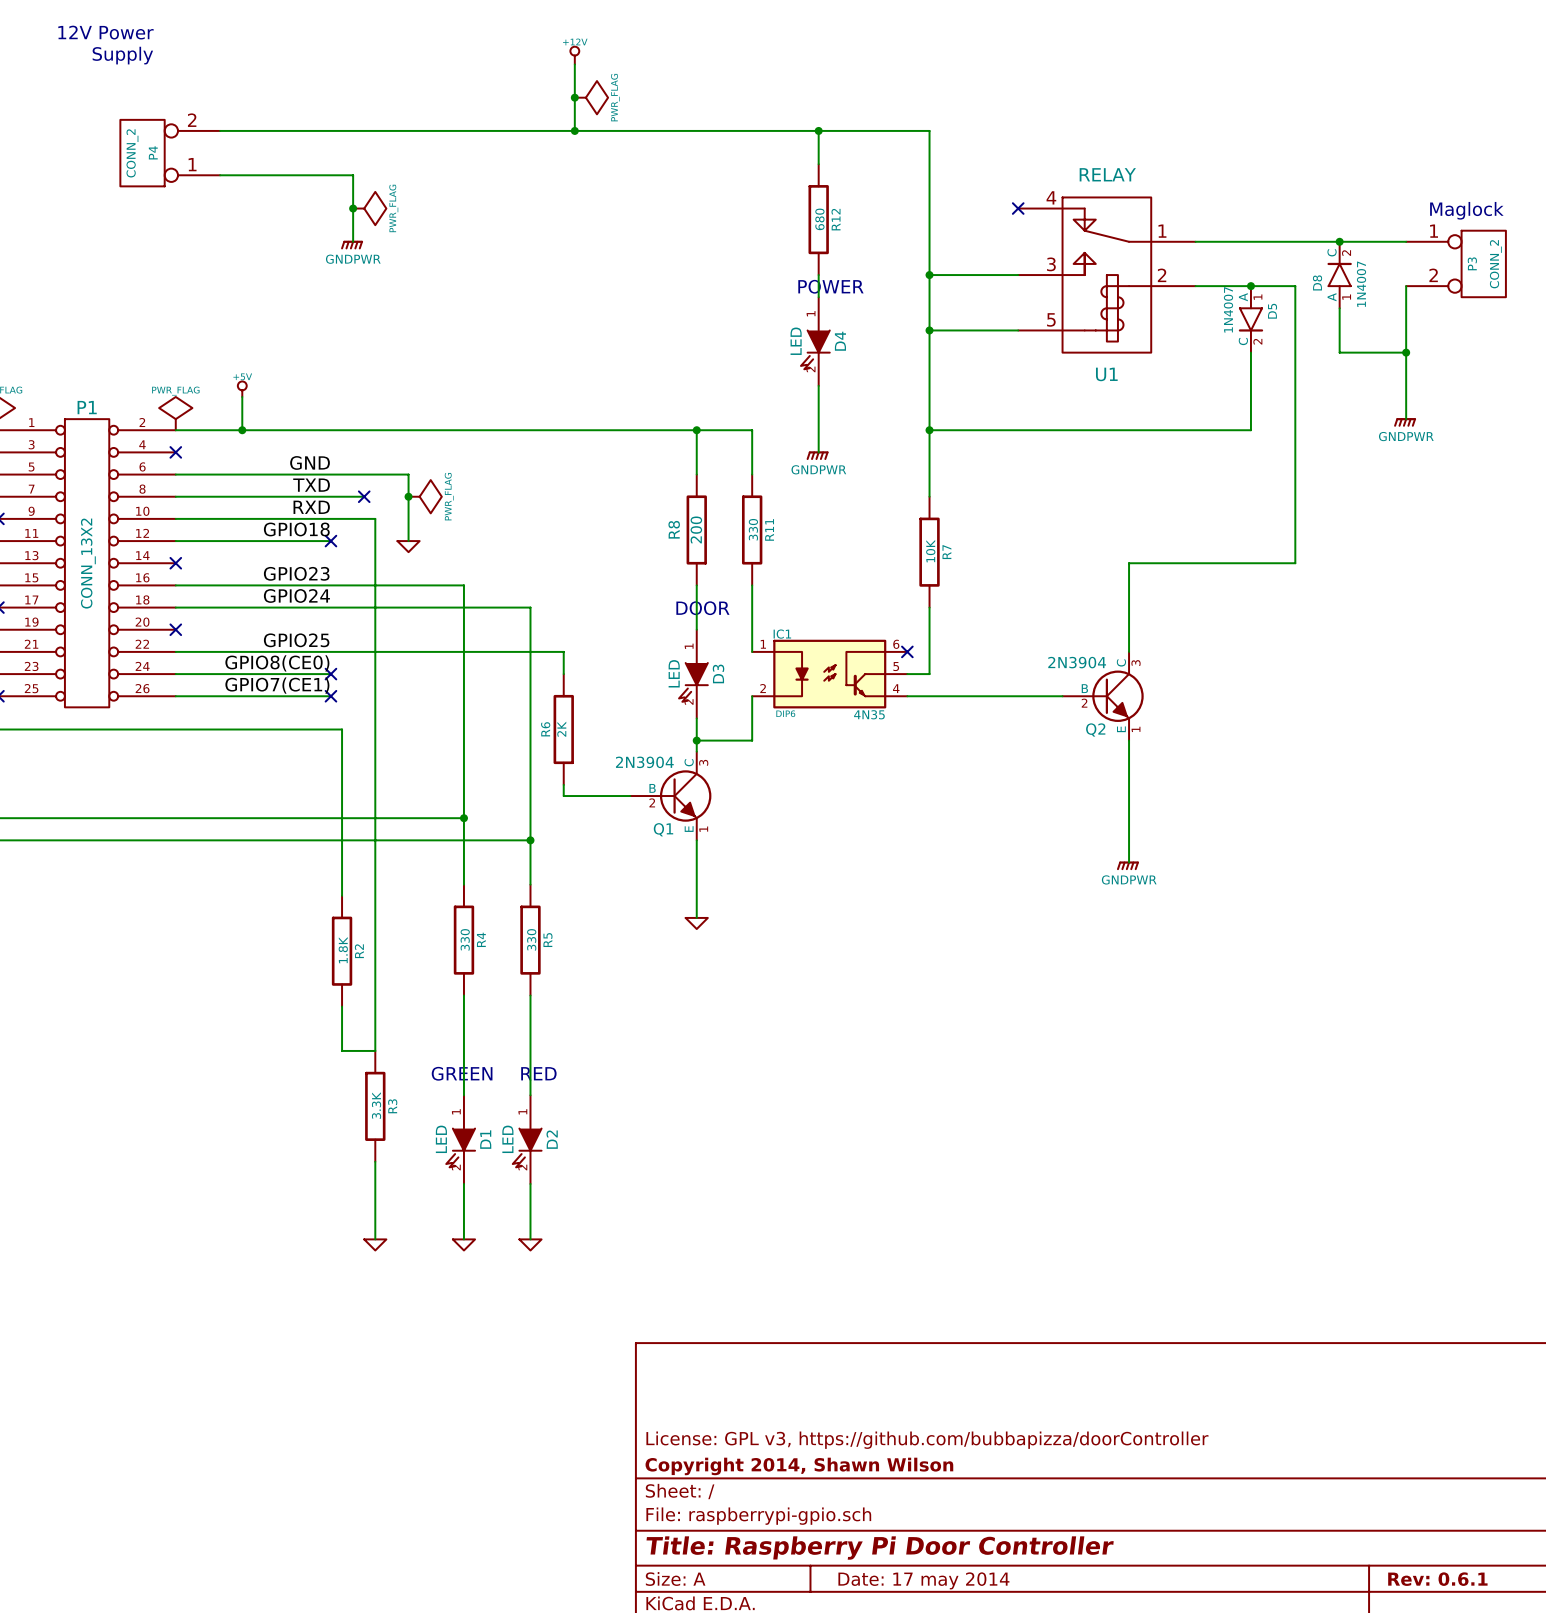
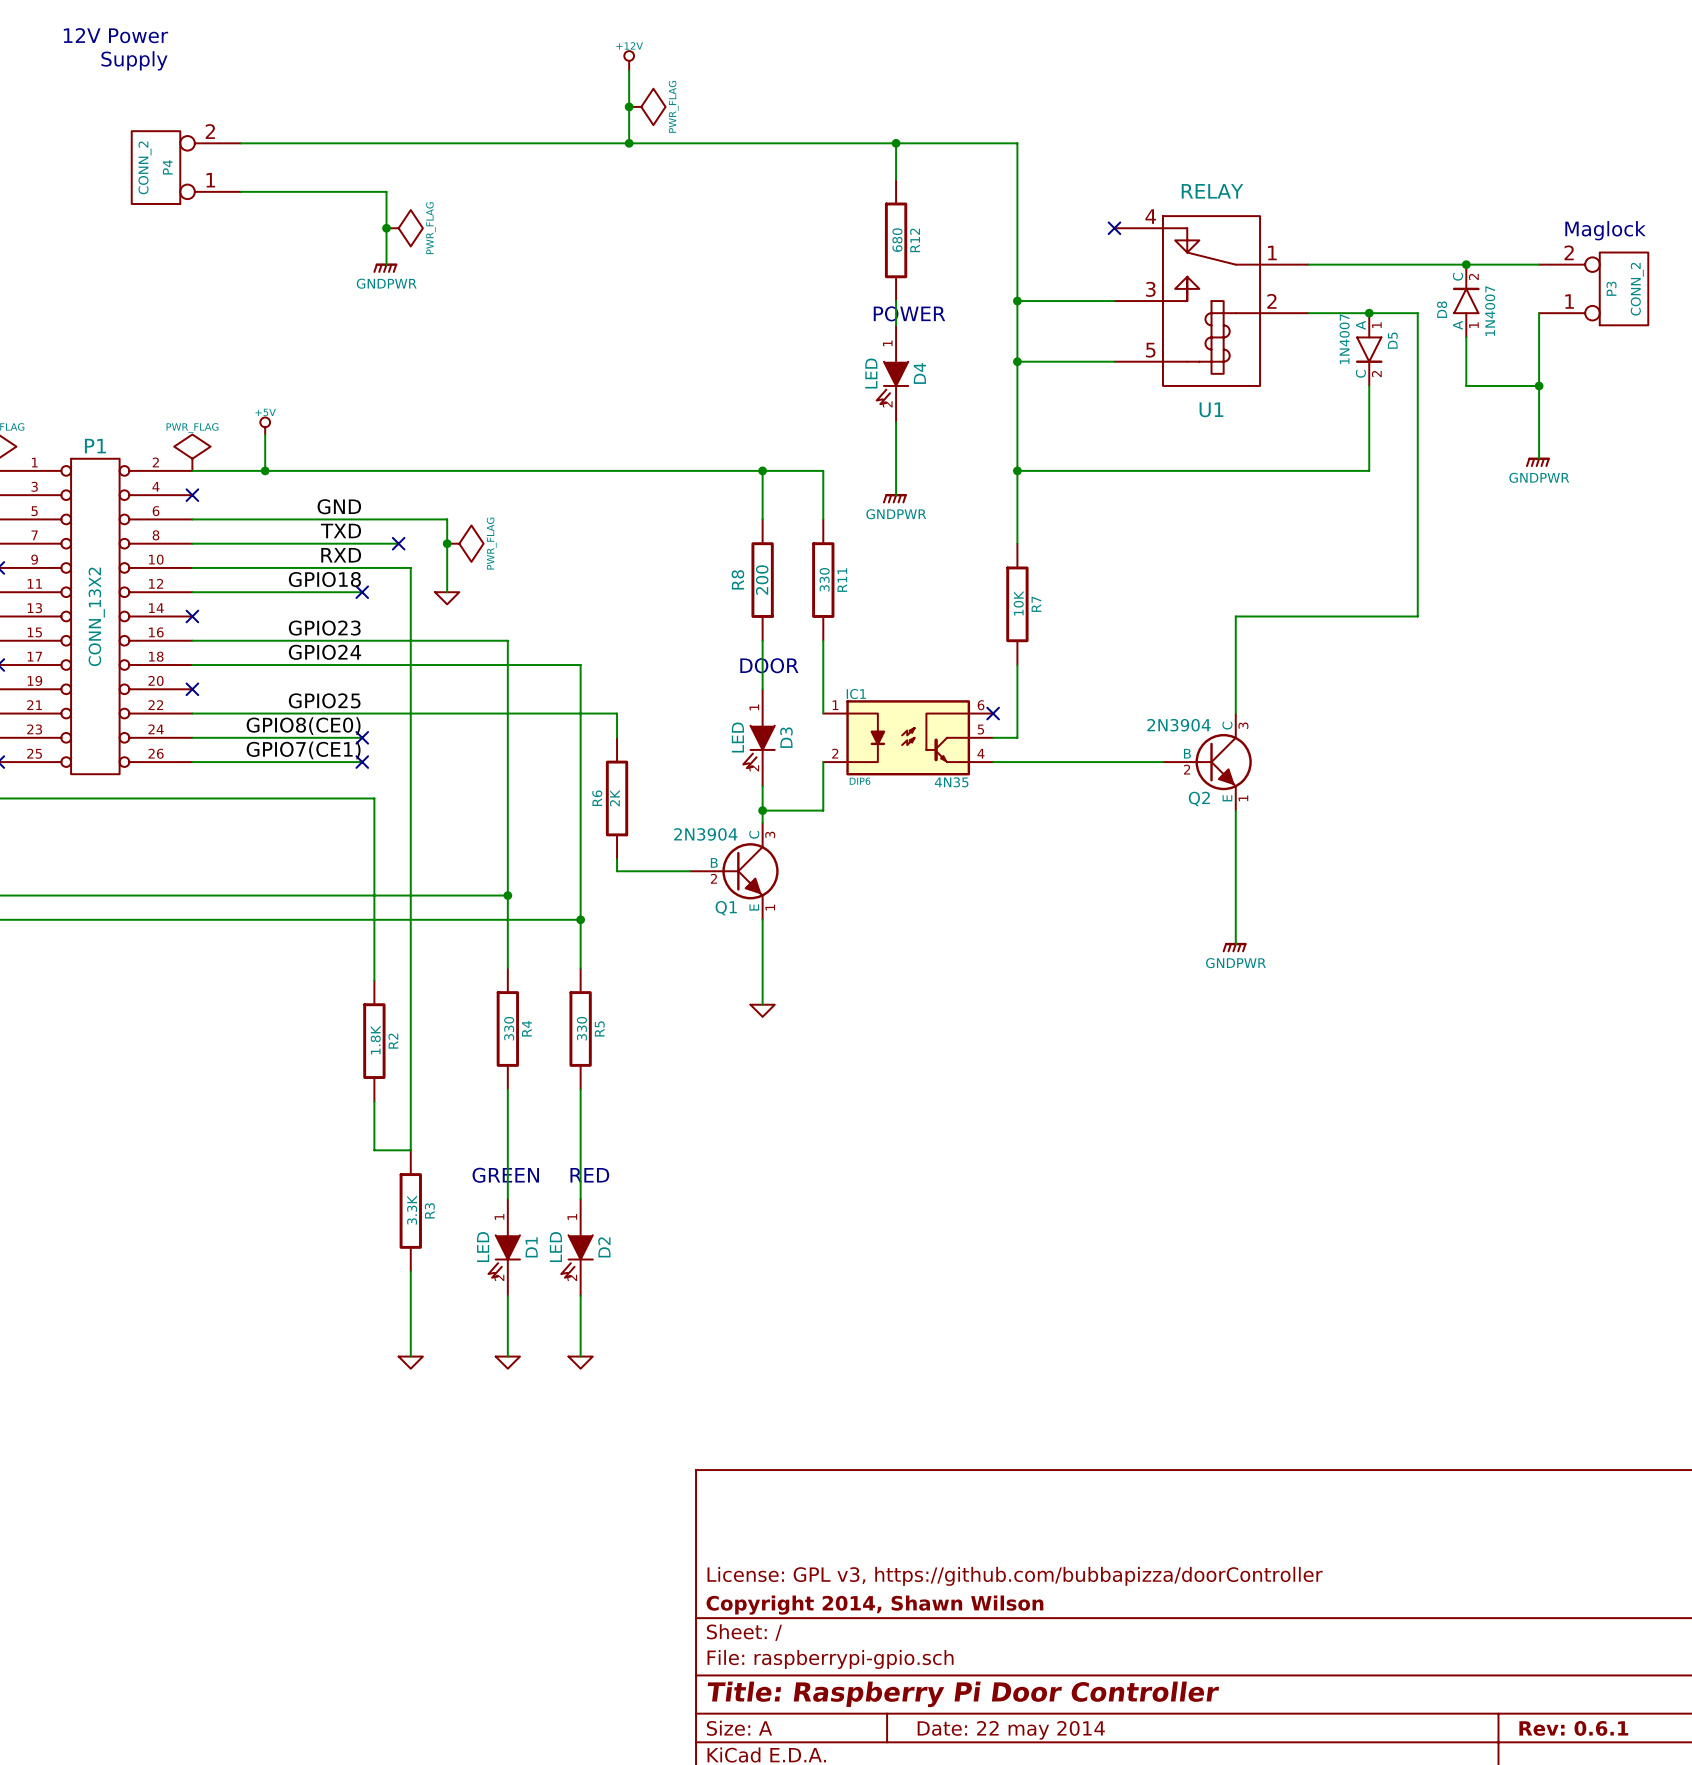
P3 flip: as is (1483, 263) -> up-down (1624, 288)
title block: Date: 17 may 2014 (923, 1580) -> Date: 22 may 2014 (1011, 1730)

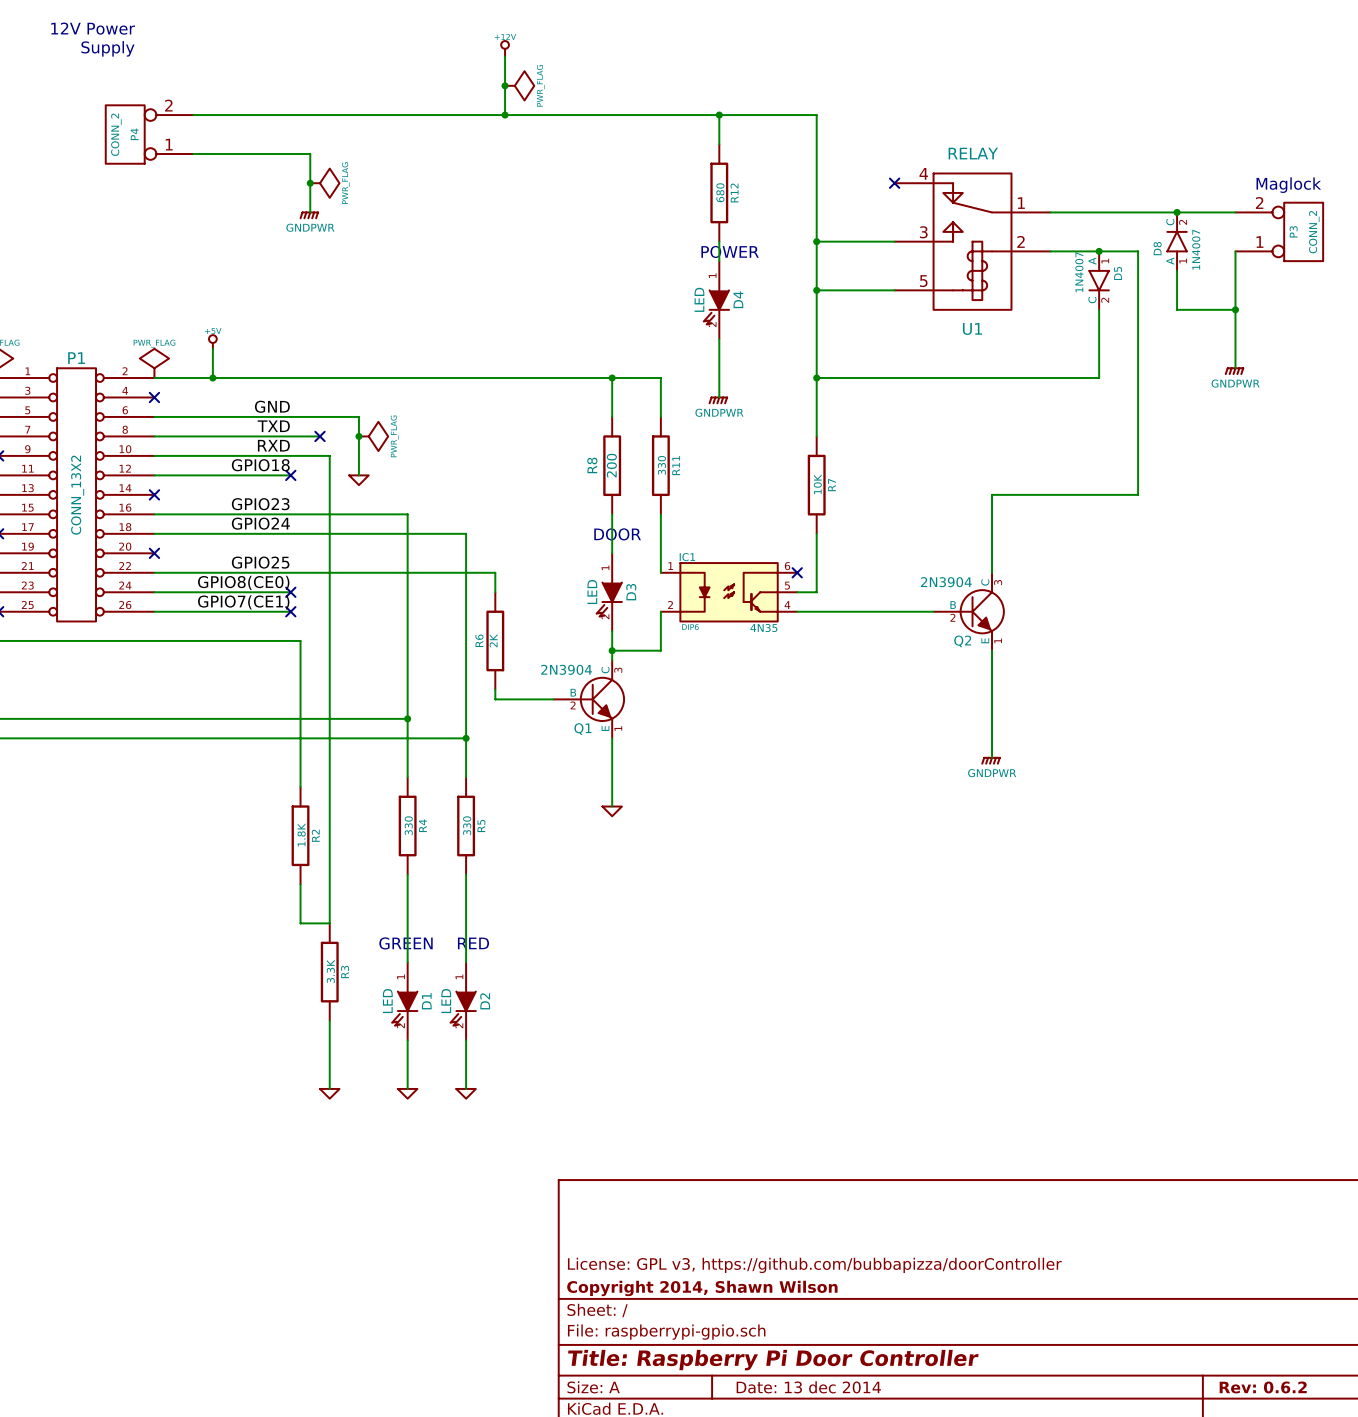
title block: Rev: 0.6.1 (1573, 1728) -> Rev: 0.6.2 (1263, 1387)
title block: Date: 22 may 2014 (1011, 1730) -> Date: 13 dec 2014 (808, 1387)

